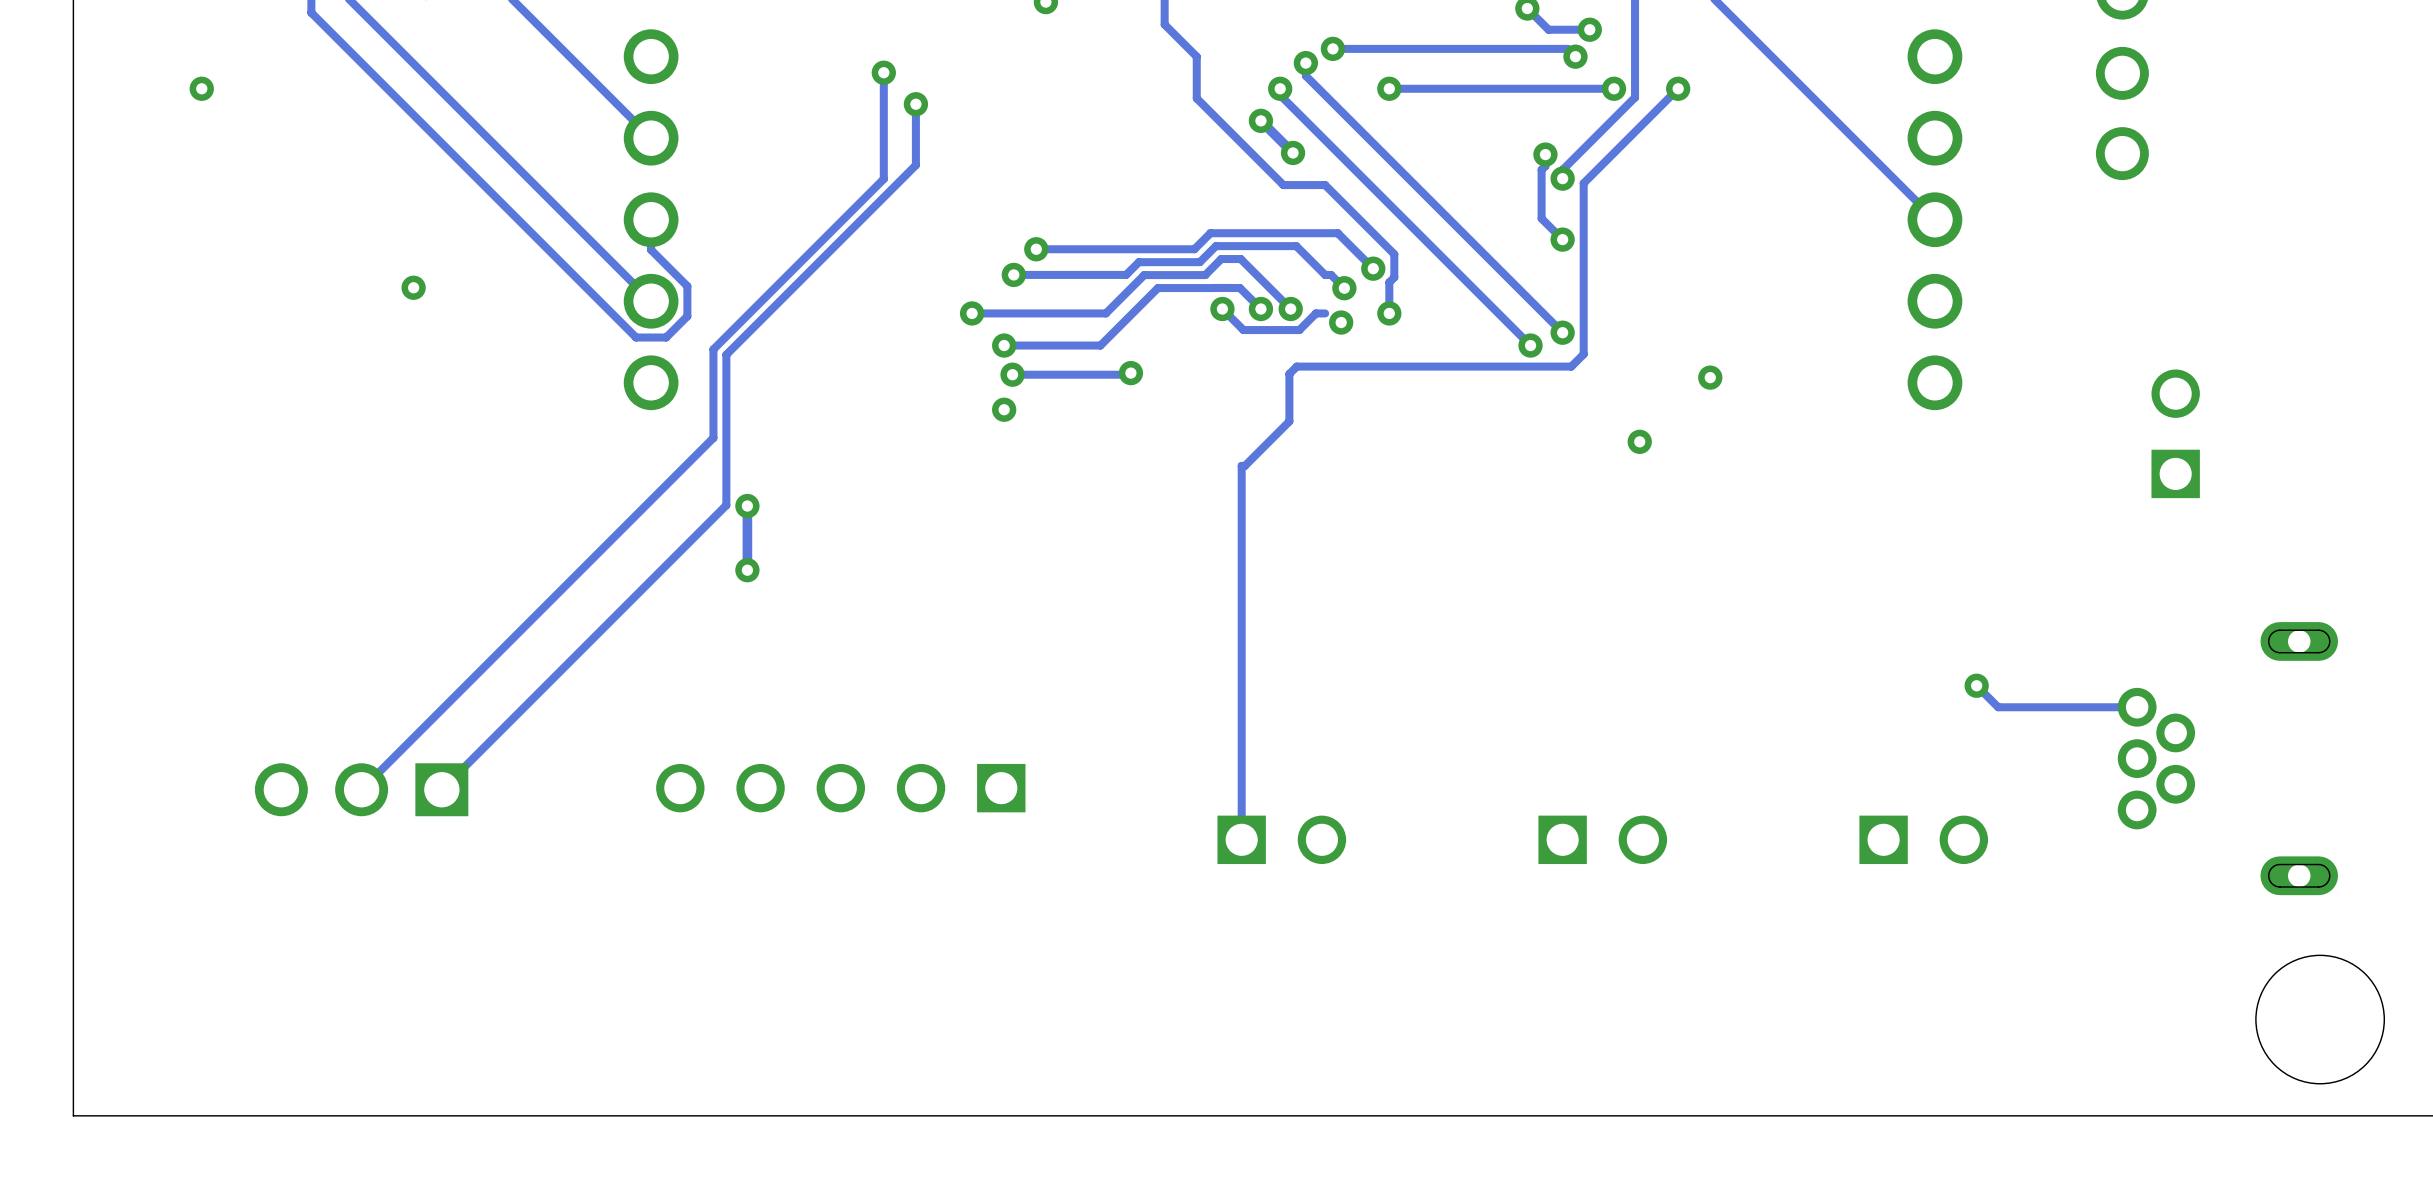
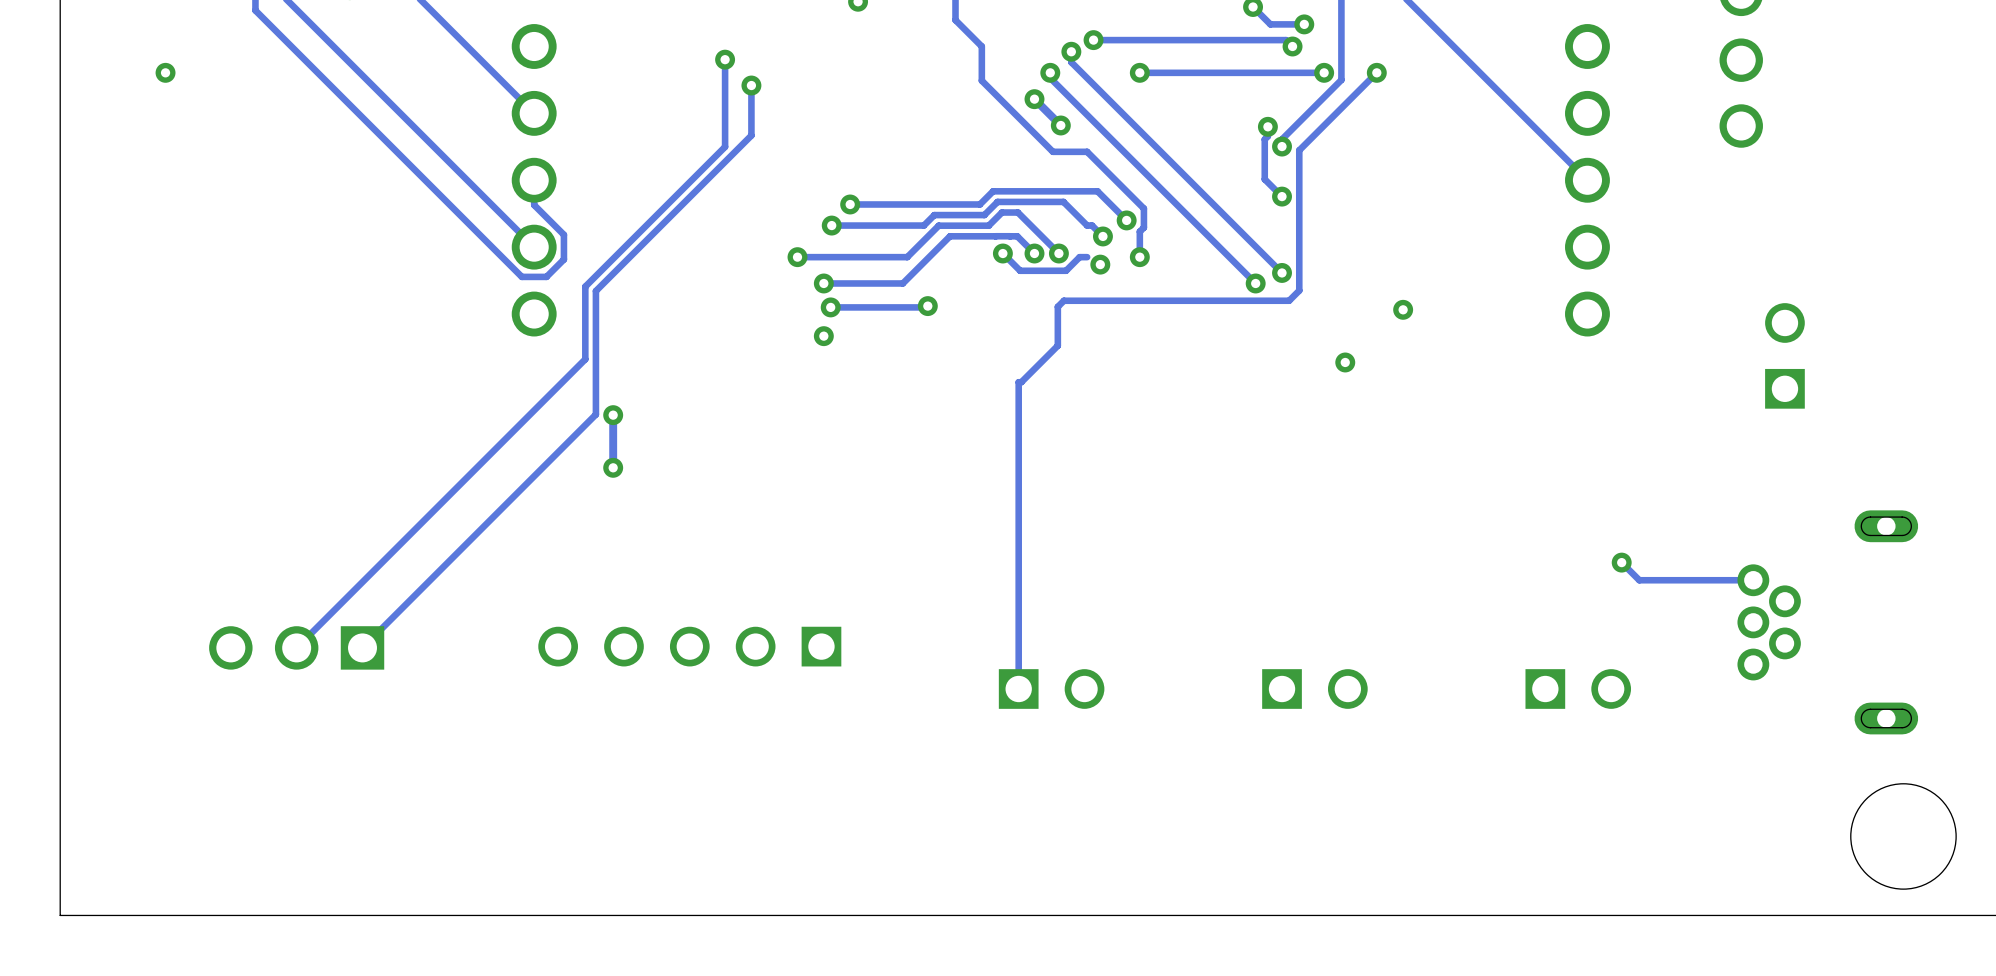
via: (413, 287) -> none

